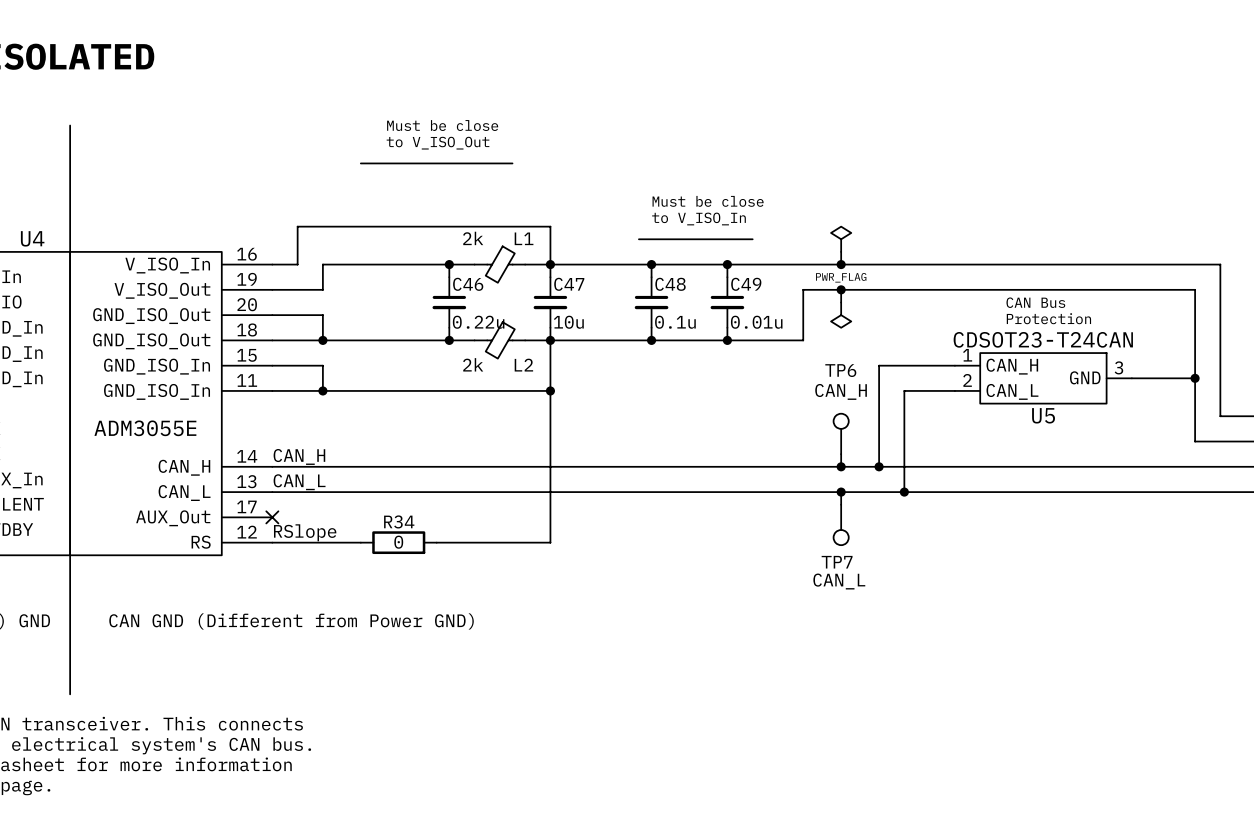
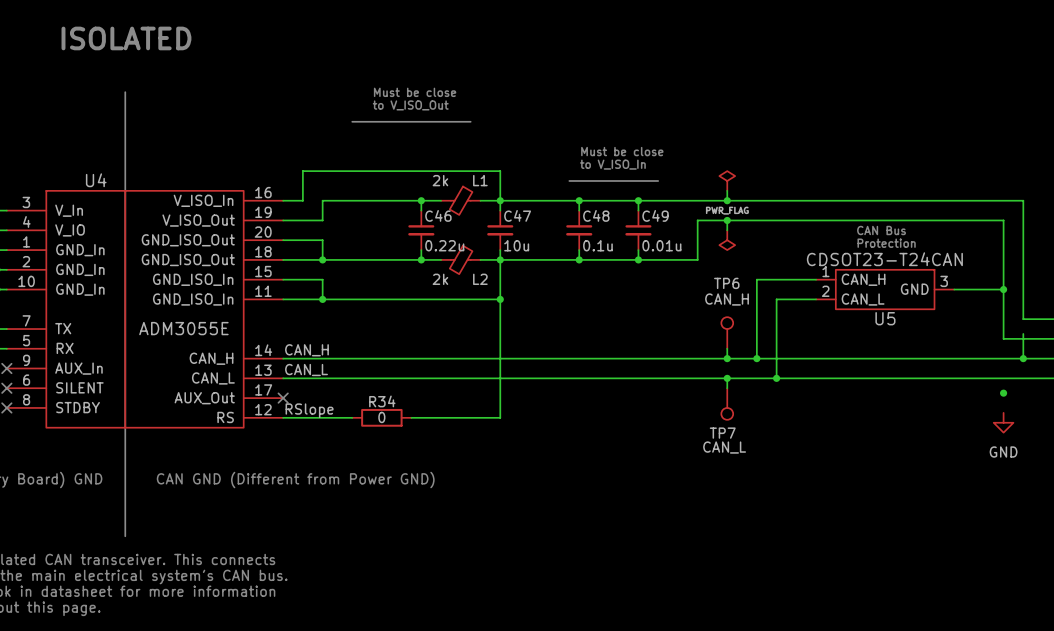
wire: none -> (1023, 333) (1023, 358)
junction: none -> (1023, 358)
junction: none -> (1003, 393)
power symbol: none -> GND (1003, 422)

